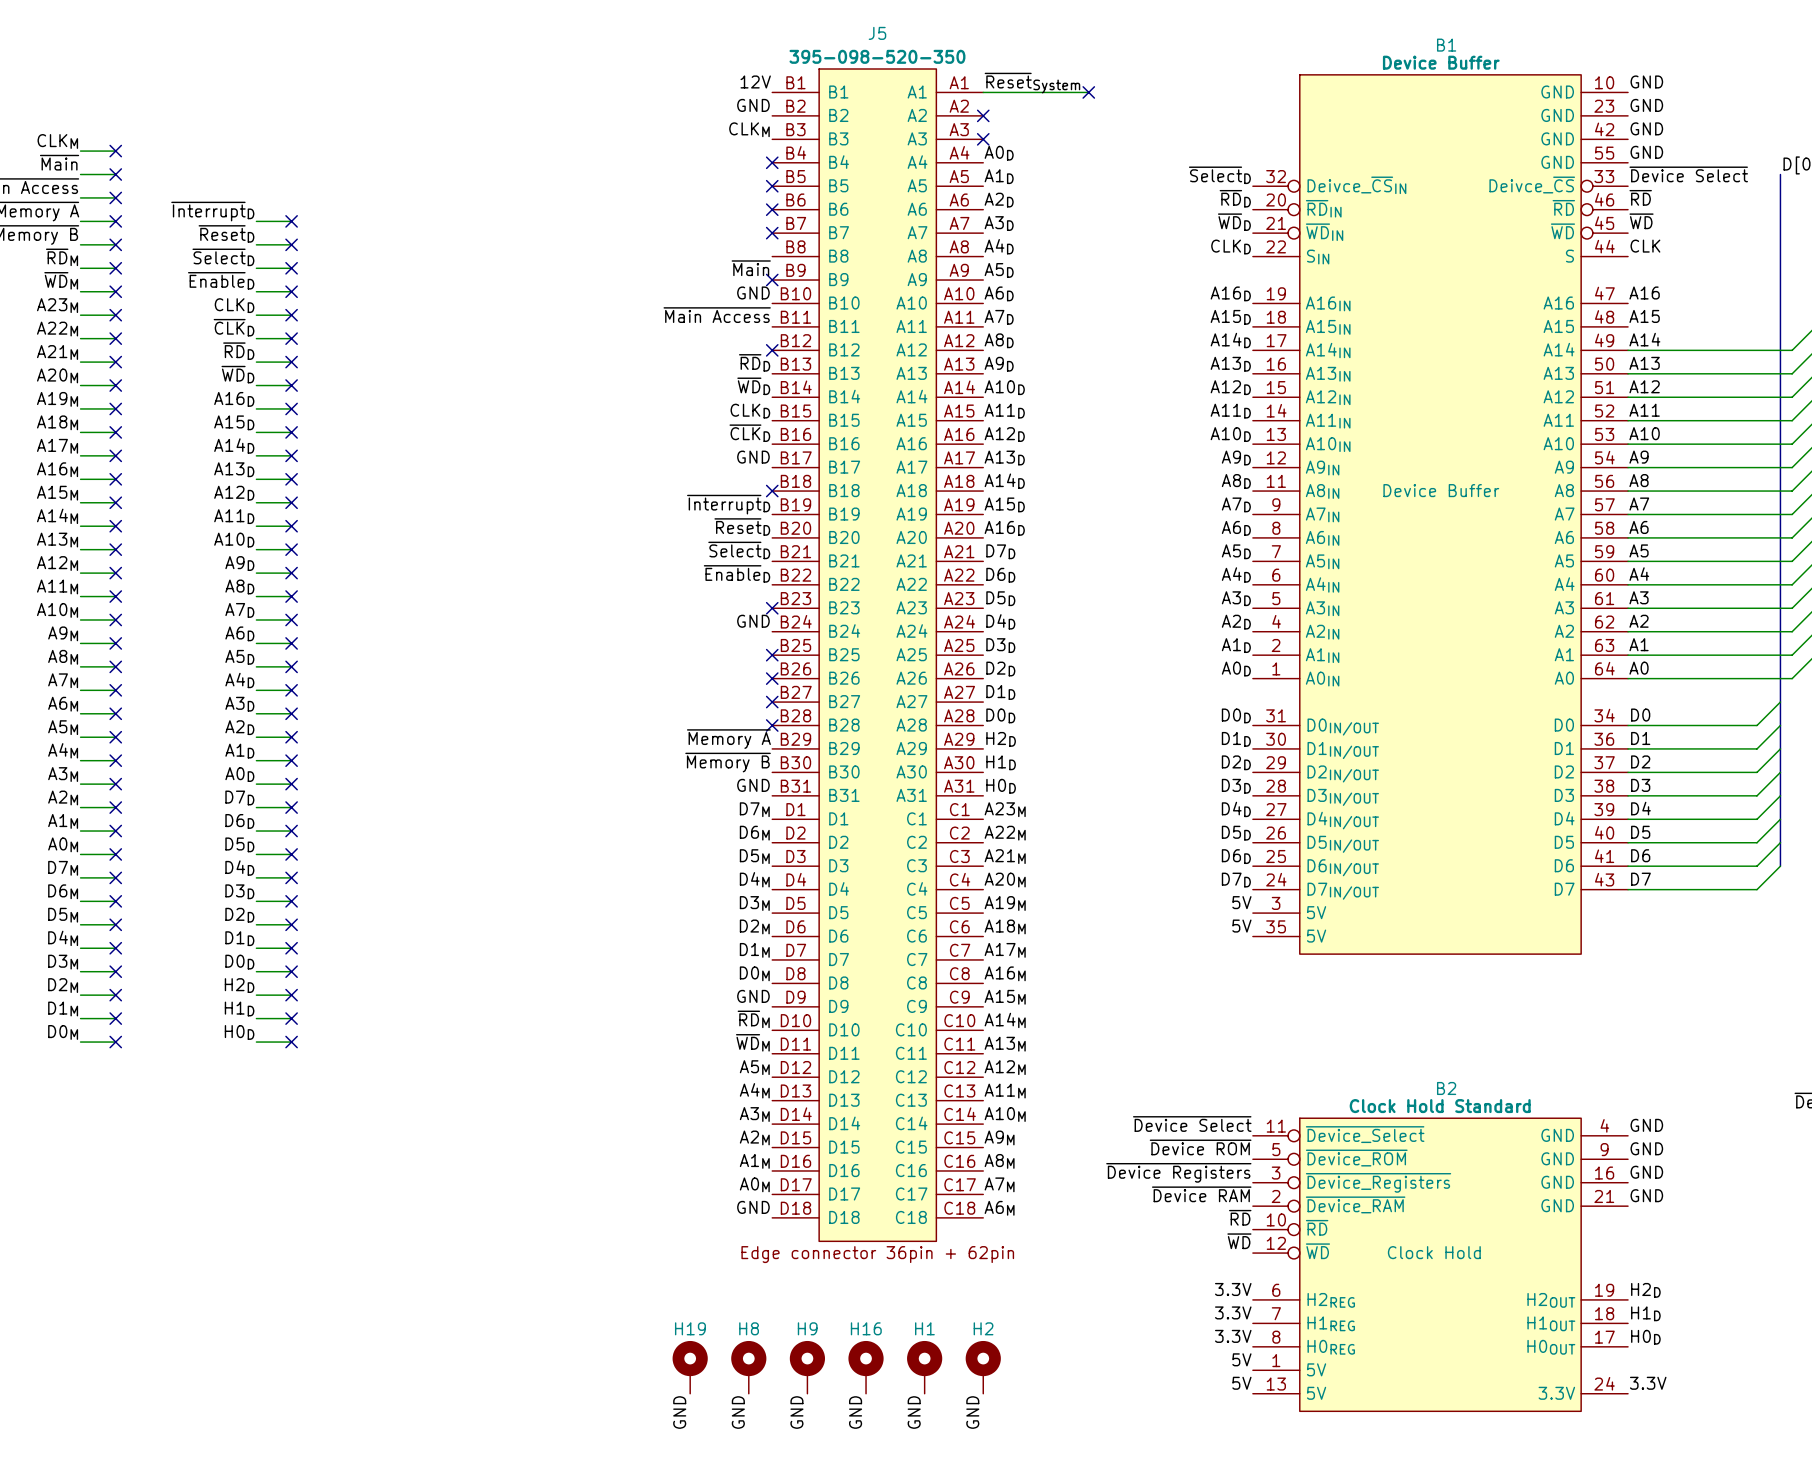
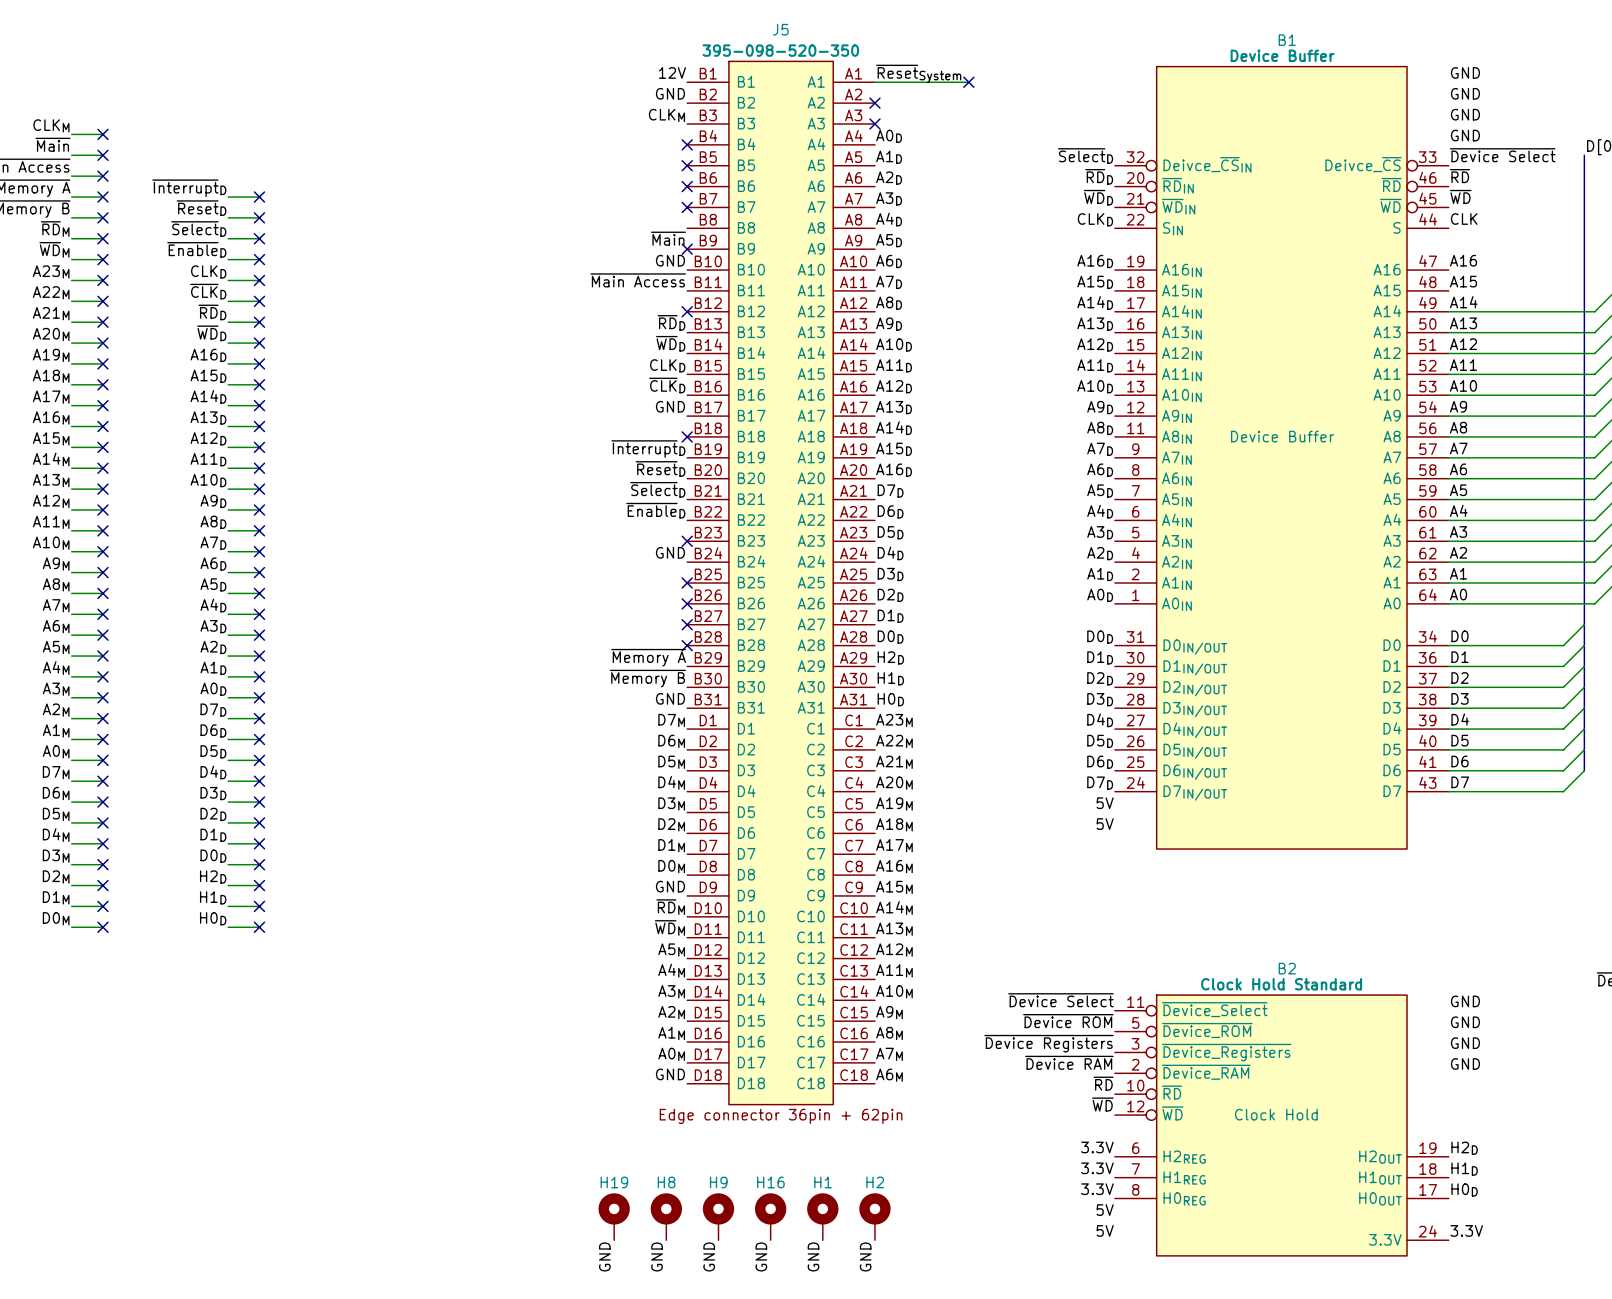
B1 symbol: [1252, 74, 1629, 955] -> [1114, 65, 1449, 850]
B2 symbol: [1252, 1117, 1629, 1413] -> [1114, 994, 1449, 1257]

